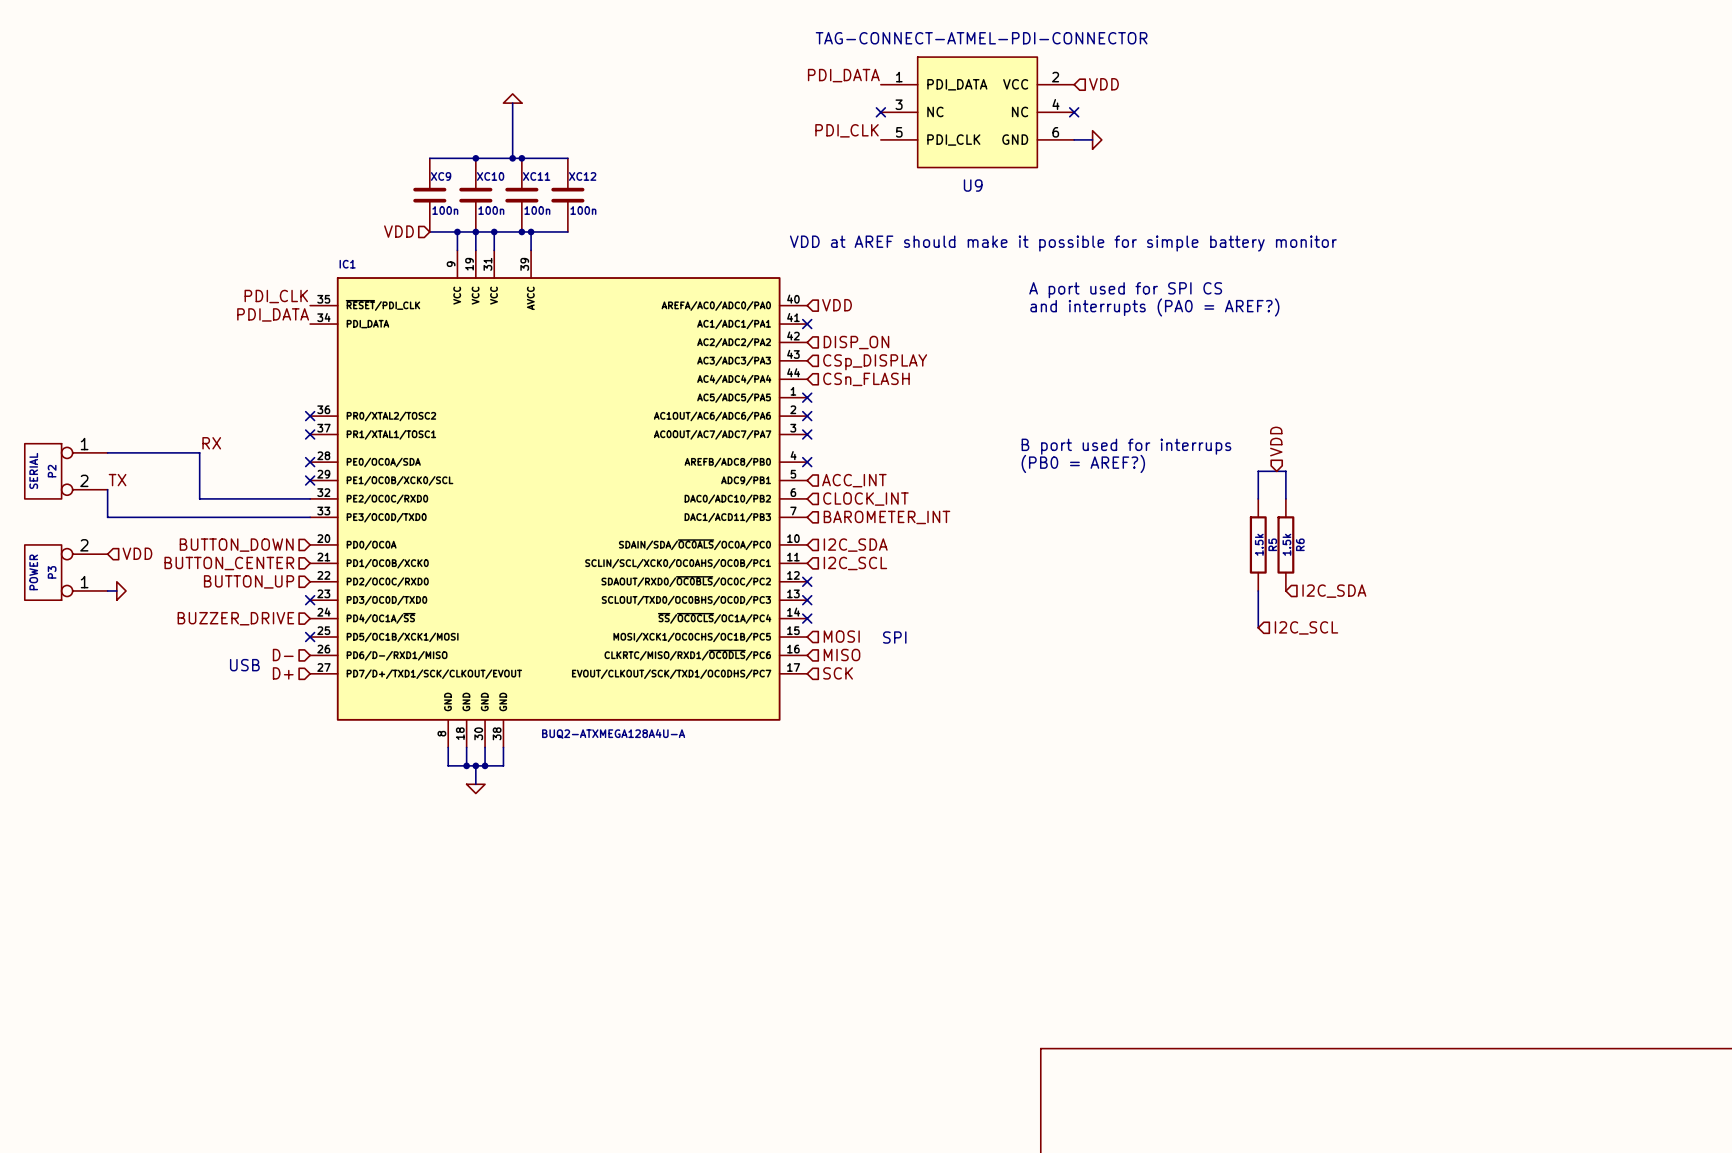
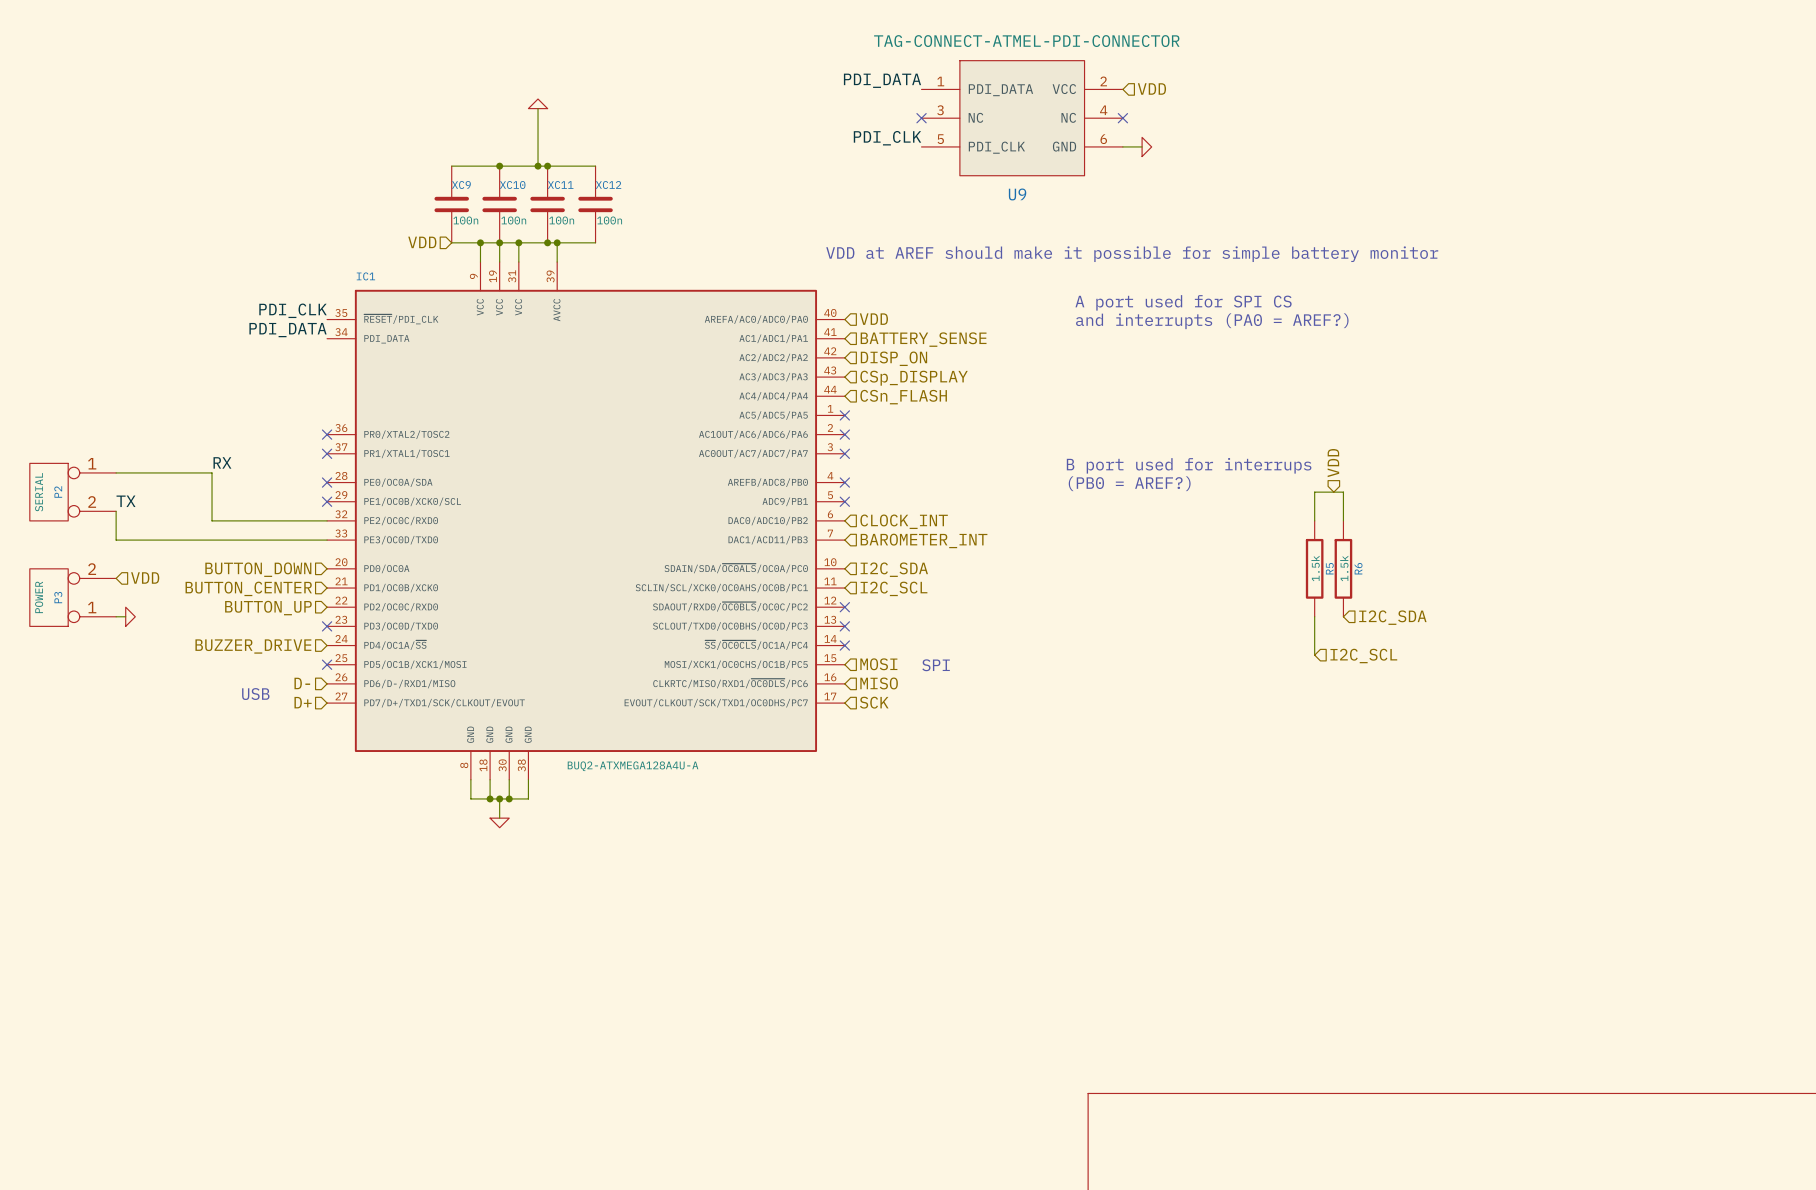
no-connect mark: (807, 324) -> none
hierarchical label: none -> BATTERY_SENSE (923, 339)
no-connect mark: none -> (844, 501)
hierarchical label: ACC_INT (854, 480) -> none

